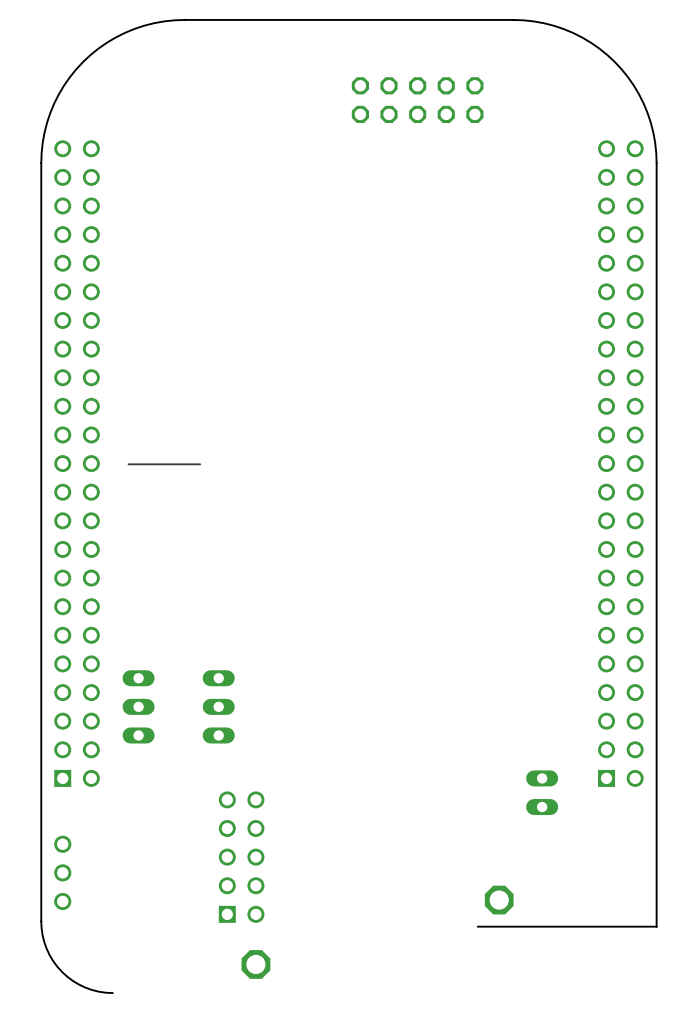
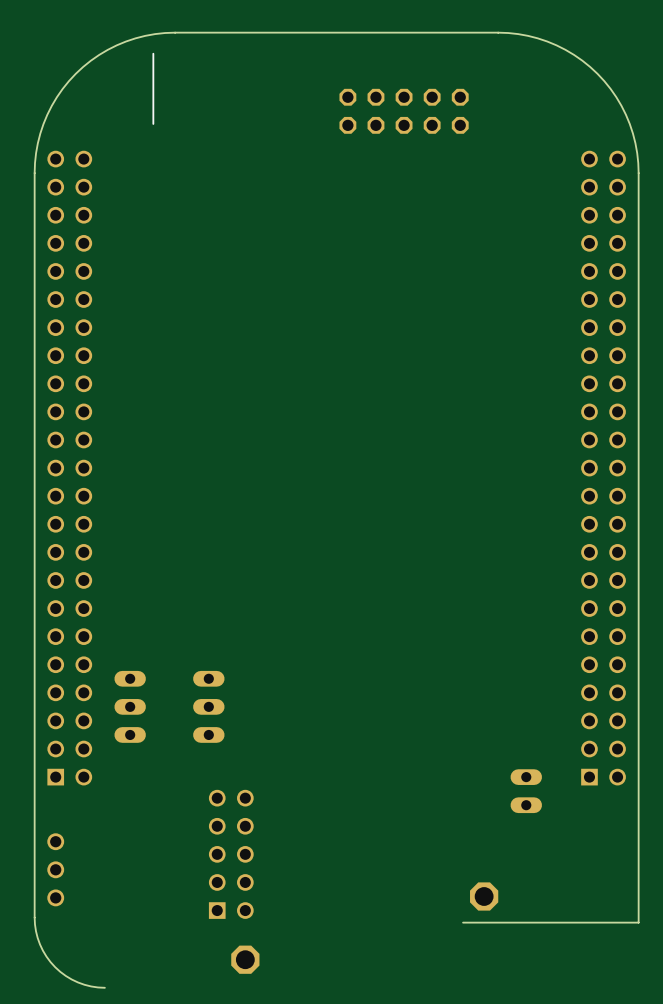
part: none -> (153, 88)
part: (164, 464) -> none

